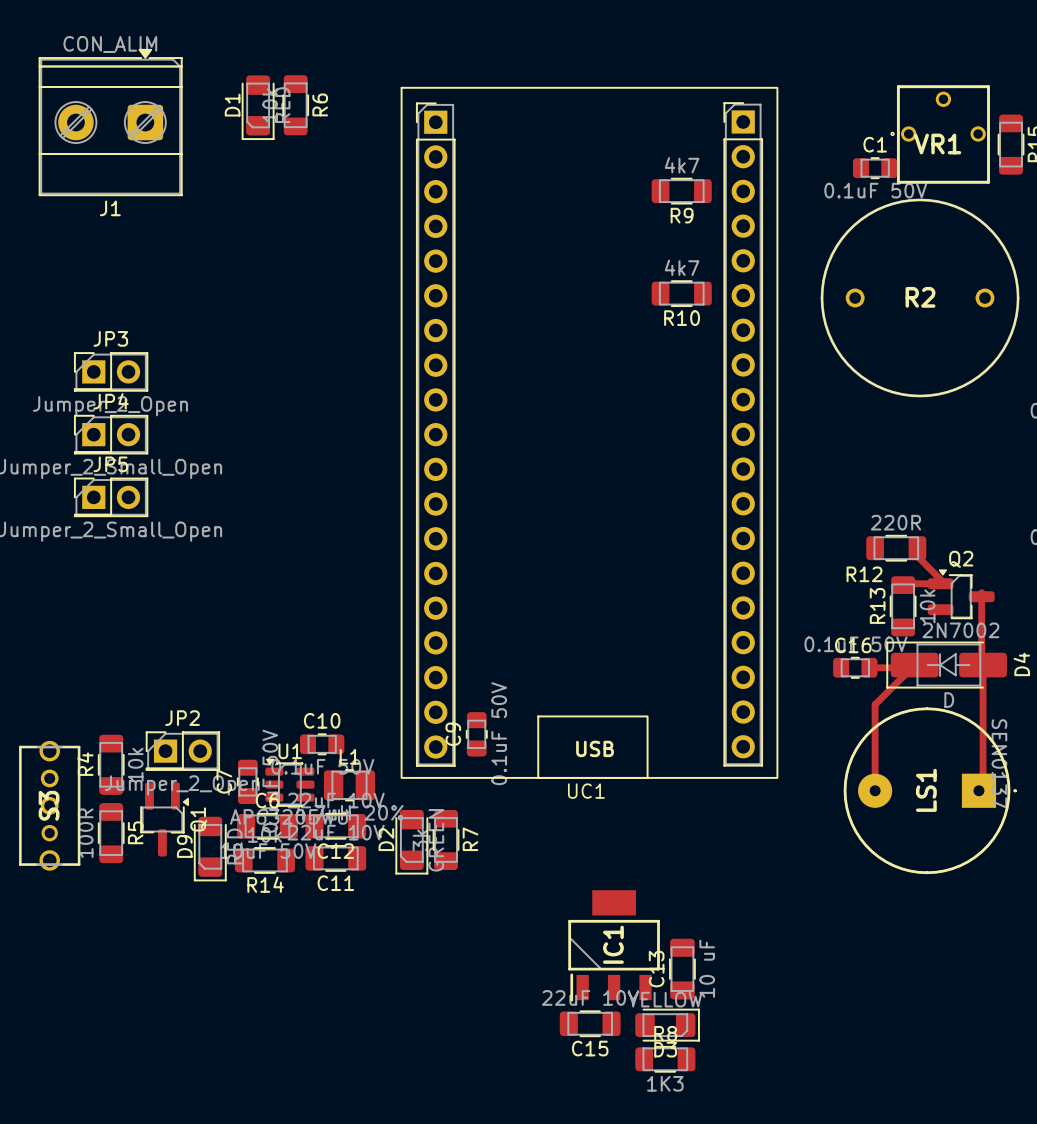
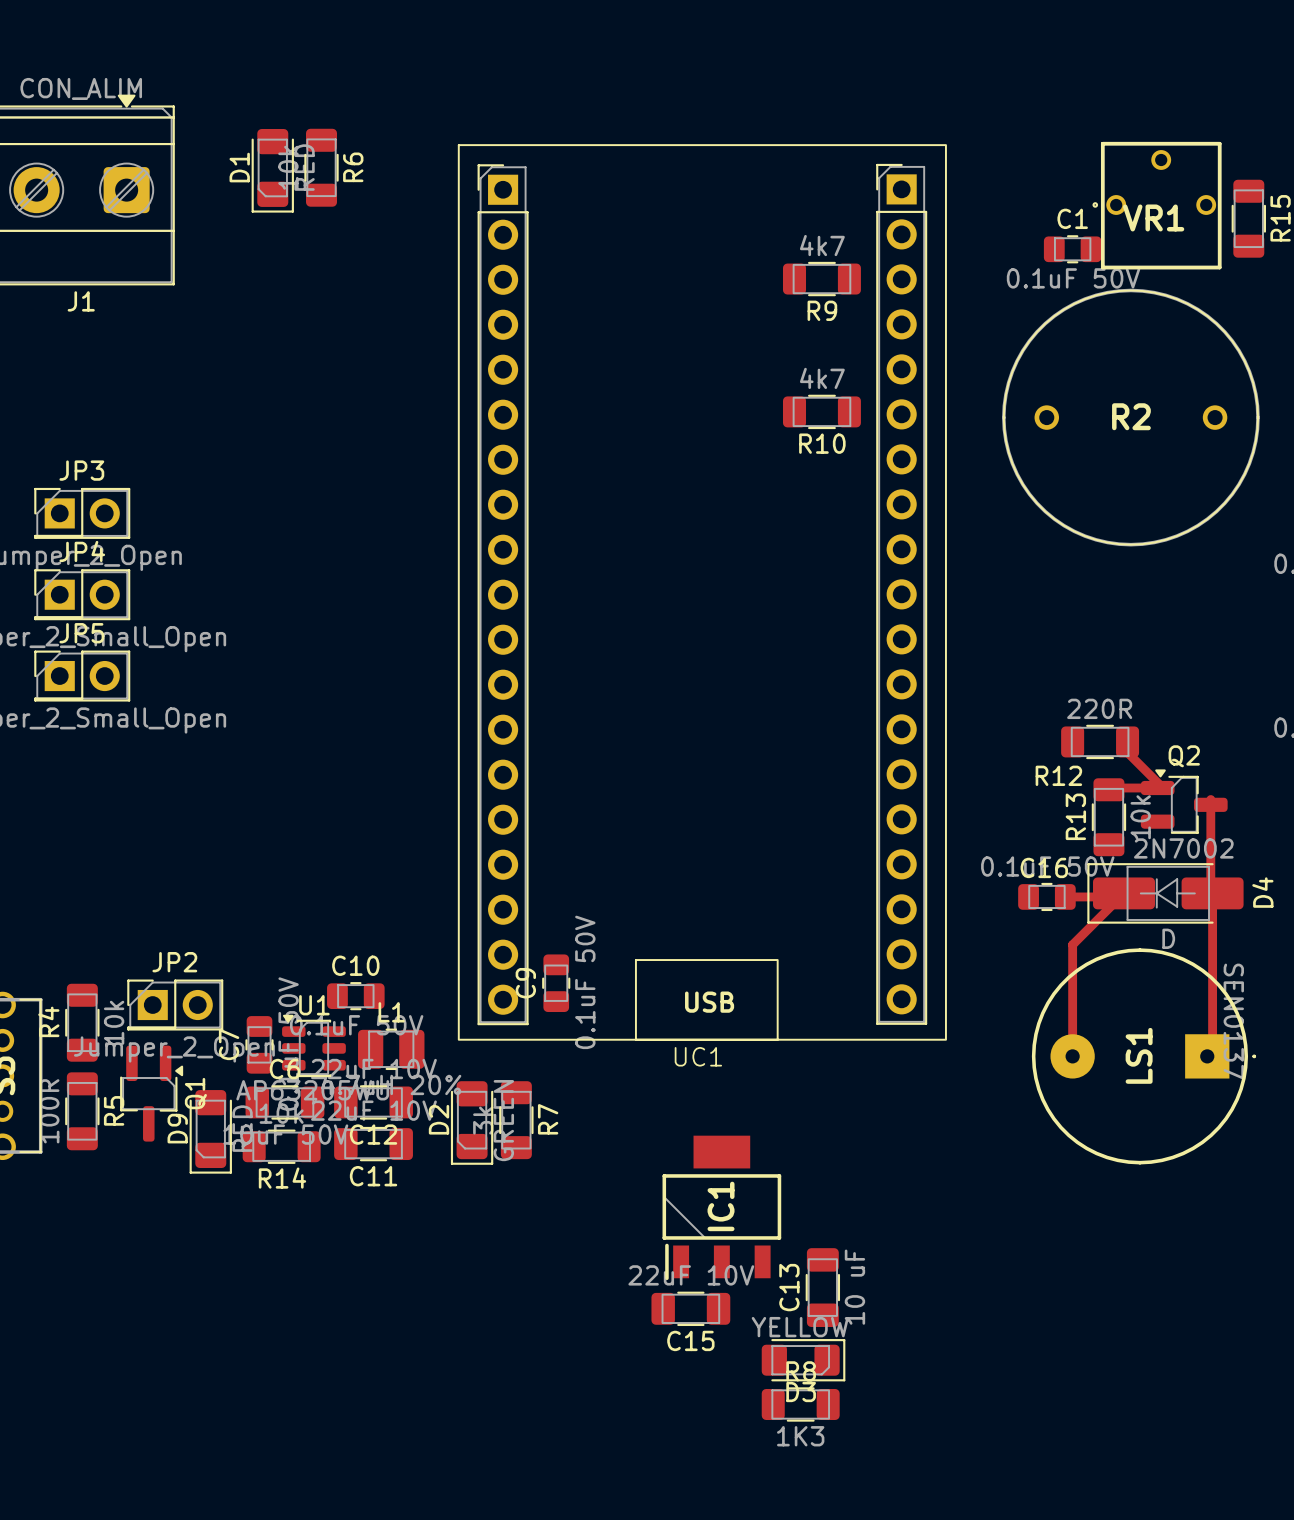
IC1 position: (614, 945) -> (721, 1207)
C15 position: (590, 1023) -> (690, 1308)

